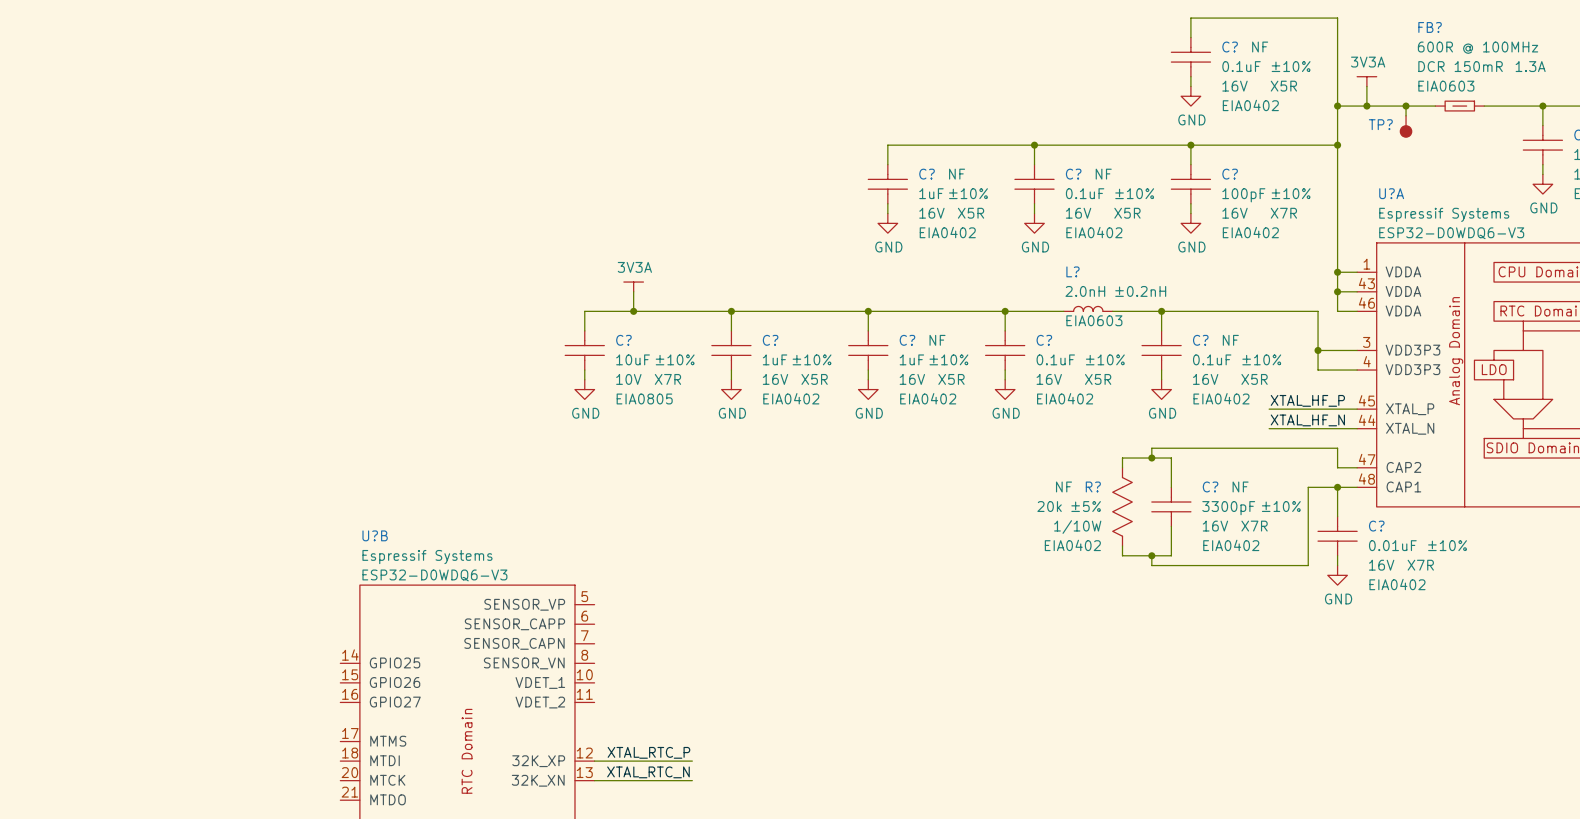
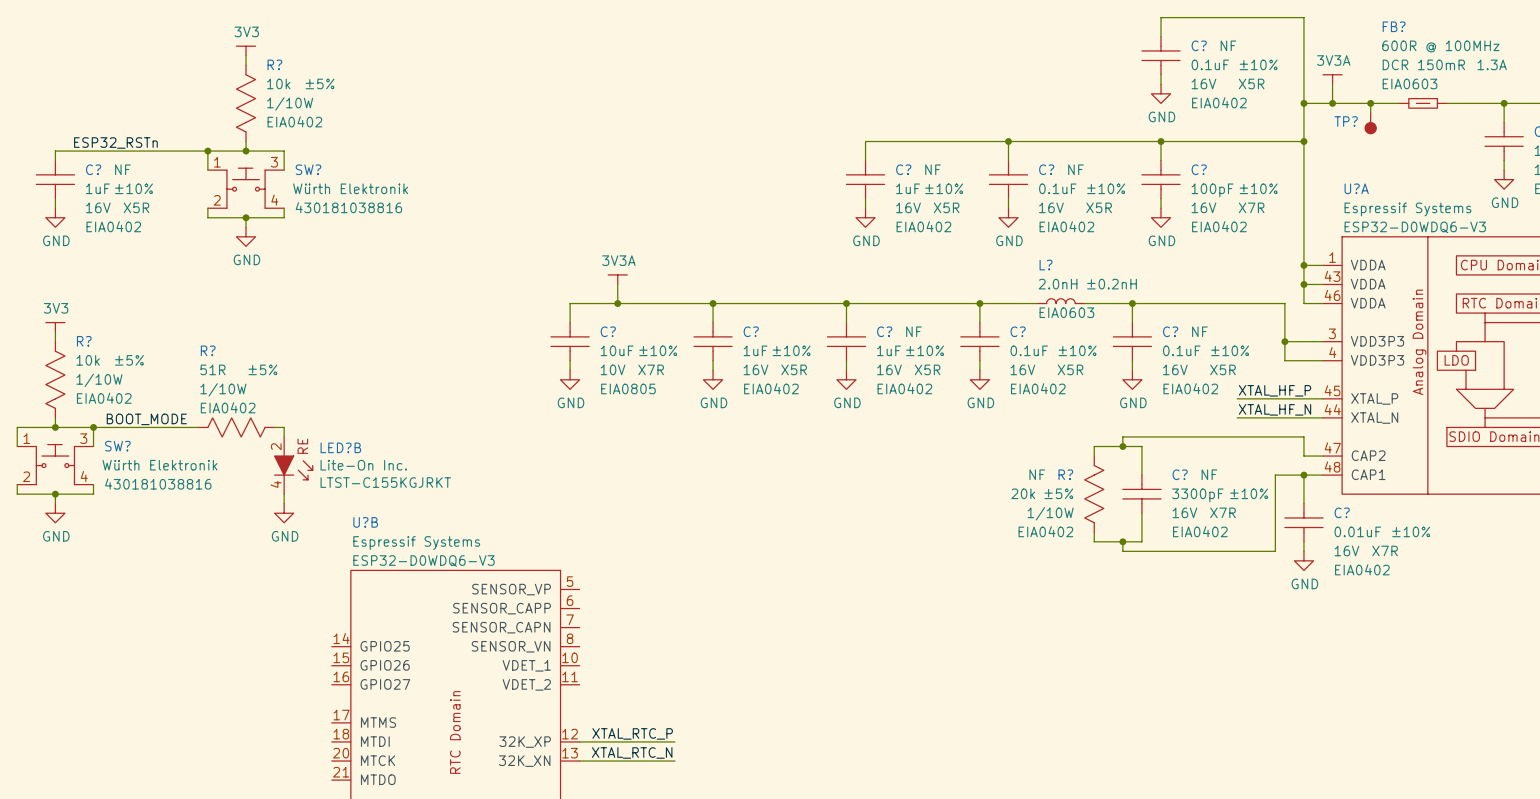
power symbol: none -> 3V3 (246, 50)
wire: none -> (246, 55) (246, 65)
R?: none -> (246, 103)
wire: none -> (246, 141) (246, 151)
label: none -> ESP32_RSTn (115, 142)
wire: none -> (207, 151) (207, 170)
junction: none -> (207, 151)
junction: none -> (246, 151)
wire: none -> (55, 160) (55, 151) (284, 151) (284, 170)
C?: none -> (55, 179)
SW?: none -> (246, 188)
wire: none -> (55, 198) (55, 208)
wire: none -> (207, 208) (207, 217) (284, 217) (284, 208)
power symbol: none -> GND (55, 217)
wire: none -> (246, 217) (246, 227)
junction: none -> (246, 217)
power symbol: none -> GND (246, 236)
power symbol: none -> 3V3 (55, 327)
wire: none -> (55, 332) (55, 341)
R?: none -> (55, 379)
wire: none -> (55, 417) (55, 427)
label: none -> BOOT_MODE (146, 419)
junction: none -> (55, 427)
wire: none -> (93, 427) (93, 446)
junction: none -> (93, 427)
wire: none -> (198, 427) (17, 427) (17, 446)
R?: none -> (236, 427)
wire: none -> (274, 427) (284, 427) (284, 436)
SW?: none -> (55, 464)
LED?B: none -> (293, 465)
wire: none -> (17, 484) (17, 494) (93, 494) (93, 484)
wire: none -> (55, 494) (55, 503)
junction: none -> (55, 494)
wire: none -> (284, 494) (284, 503)
power symbol: none -> GND (55, 513)
power symbol: none -> GND (284, 513)

